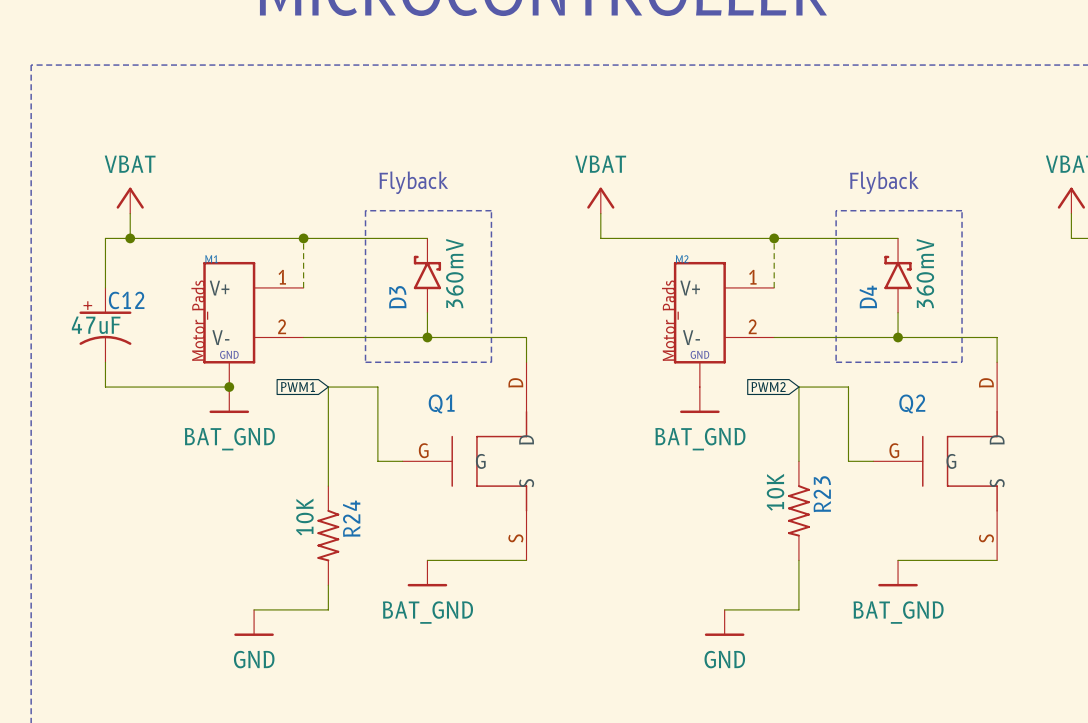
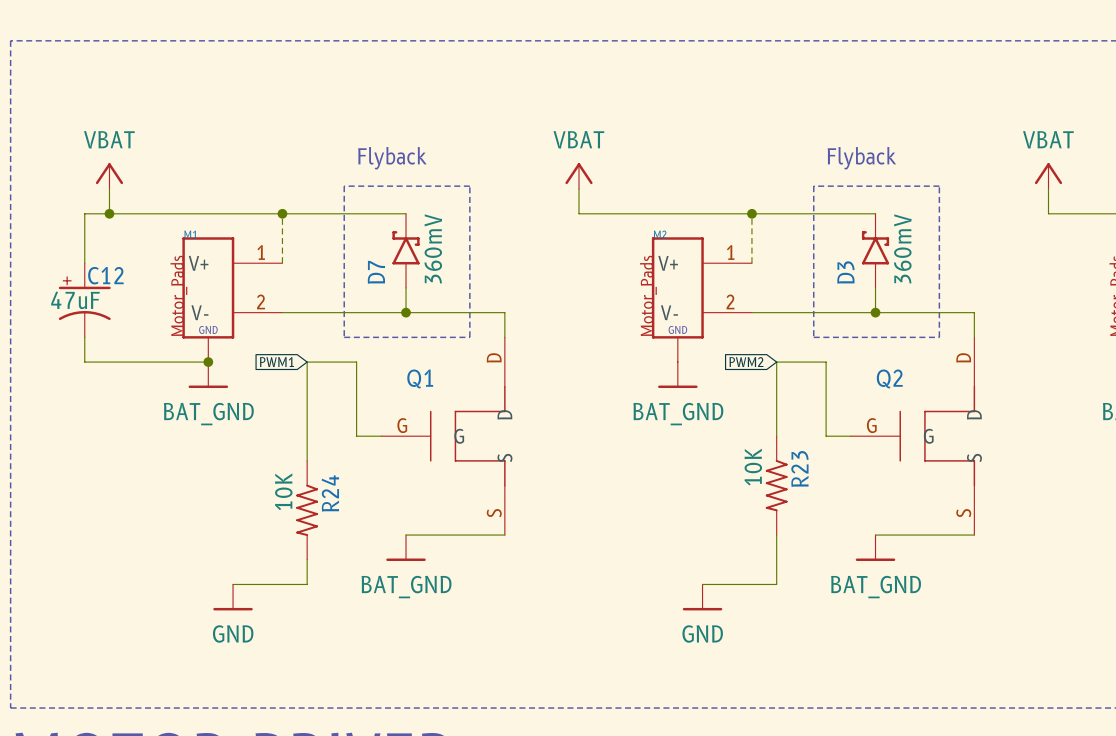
D3 name: D3 (397, 297) -> D7 (376, 272)
D4 name: D4 (868, 297) -> D3 (845, 272)

